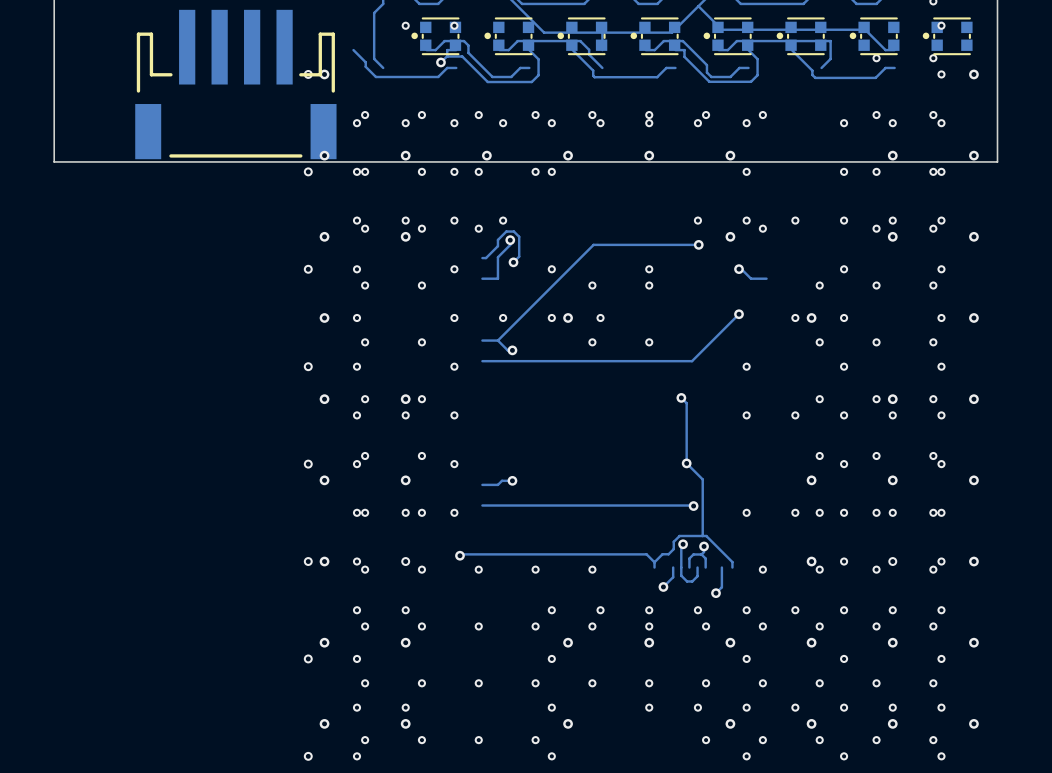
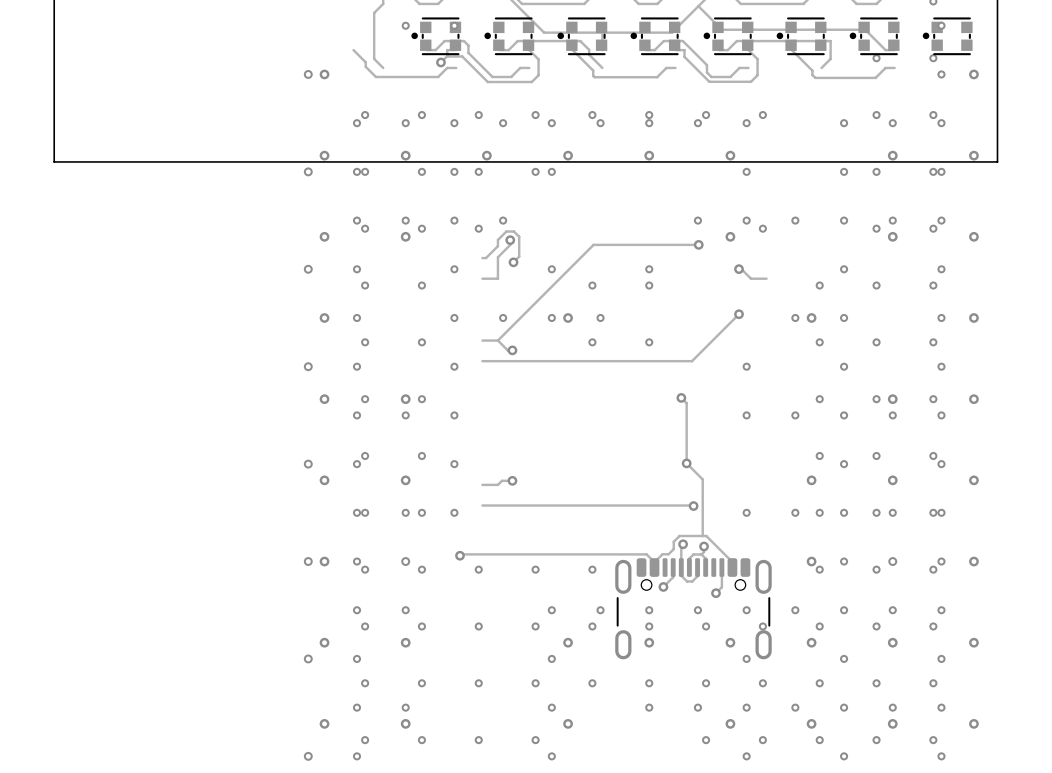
part: (235, 84) -> none
part: none -> (693, 608)

